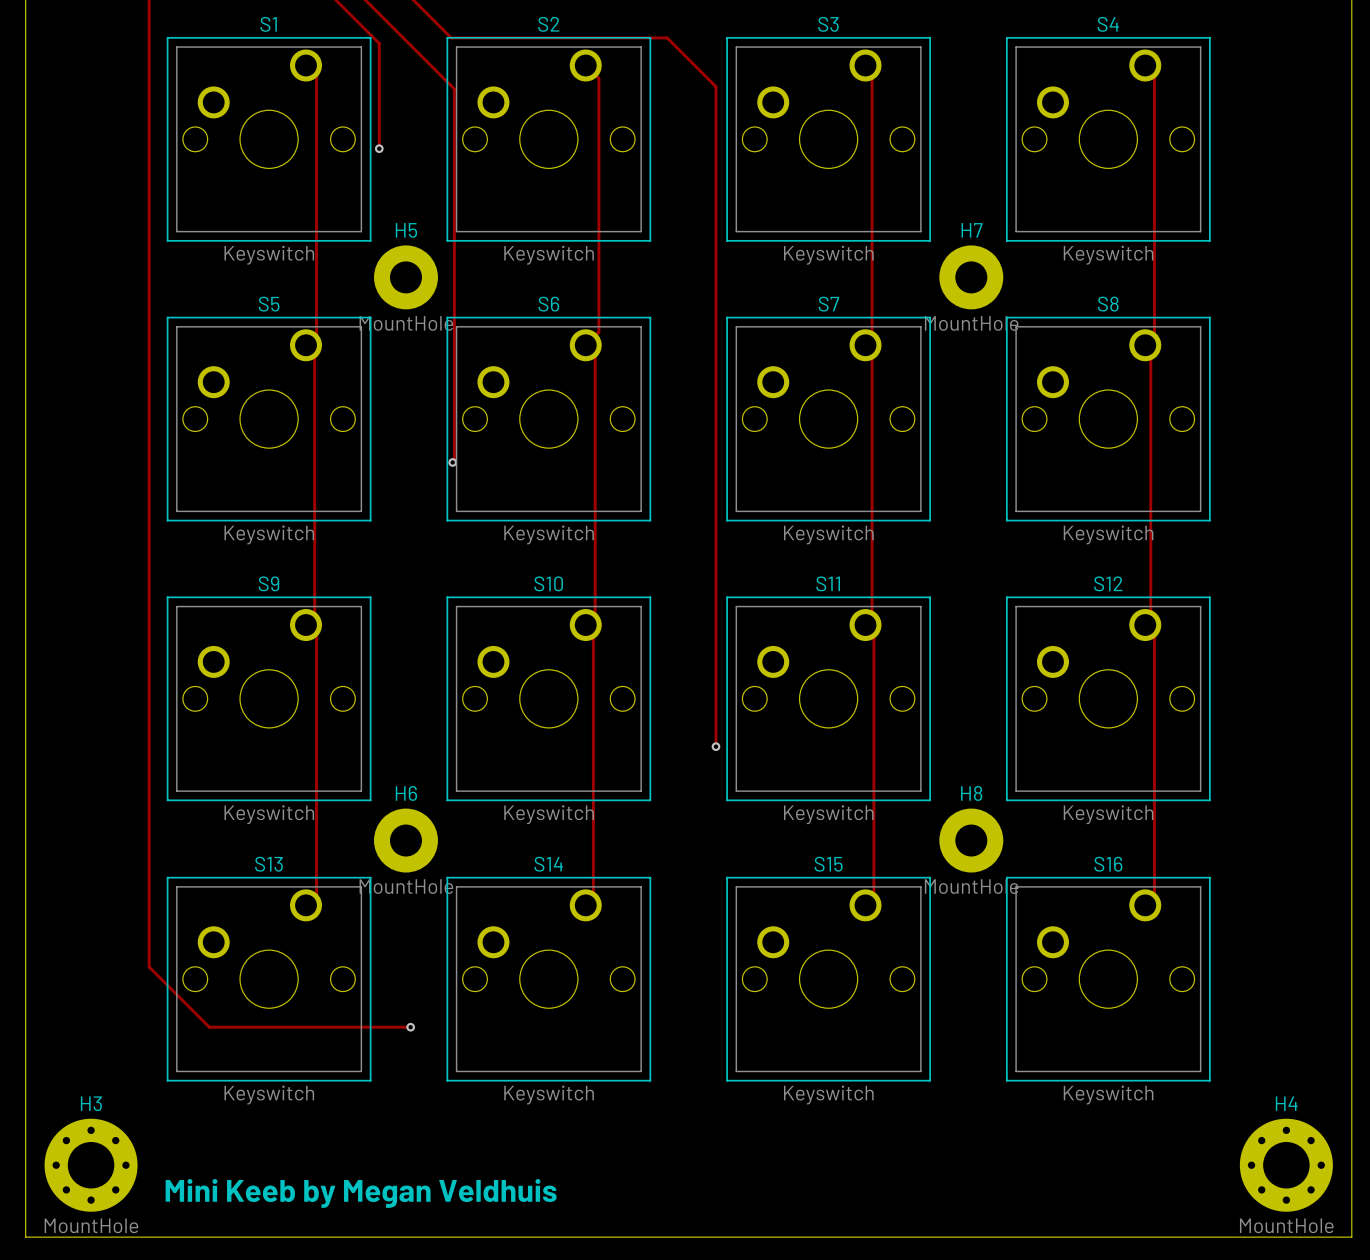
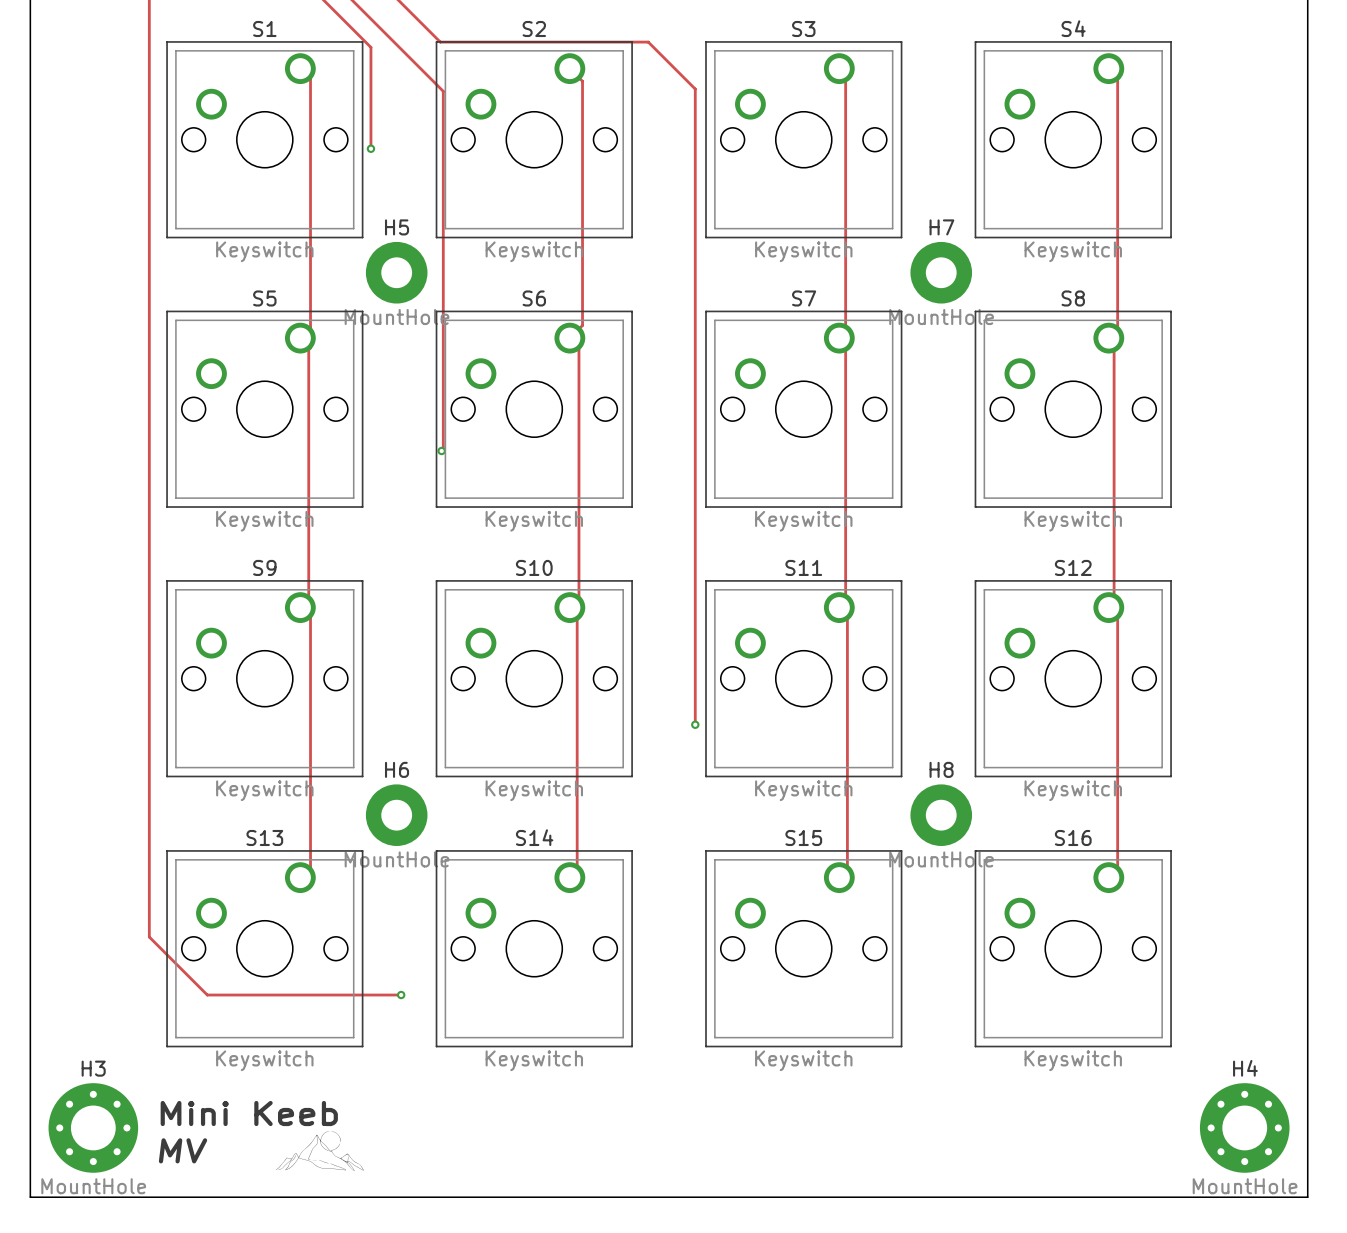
text: none -> Mini Keeb (249, 1113)
drawing: none -> [275, 1131, 364, 1171]
text: Mini Keeb by Megan Veldhuis (361, 1193) -> MV (183, 1150)

